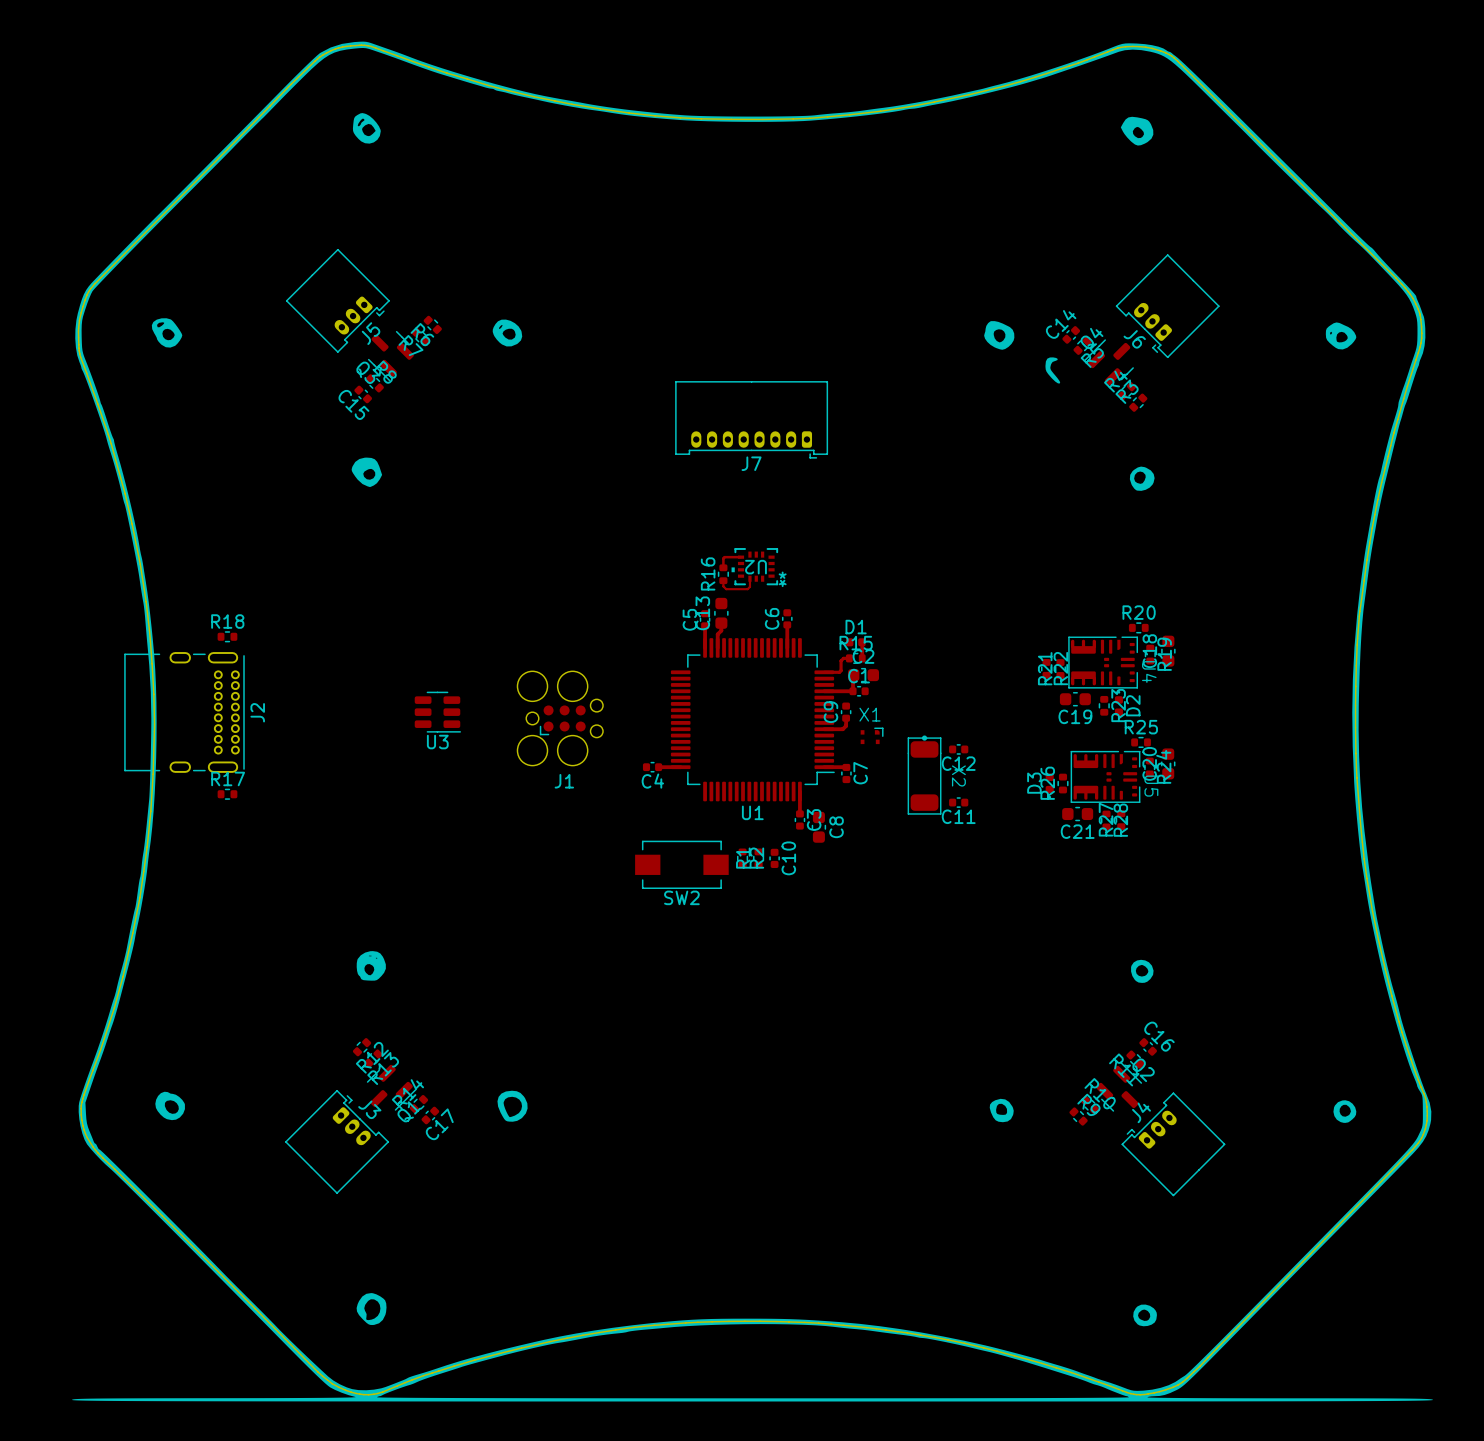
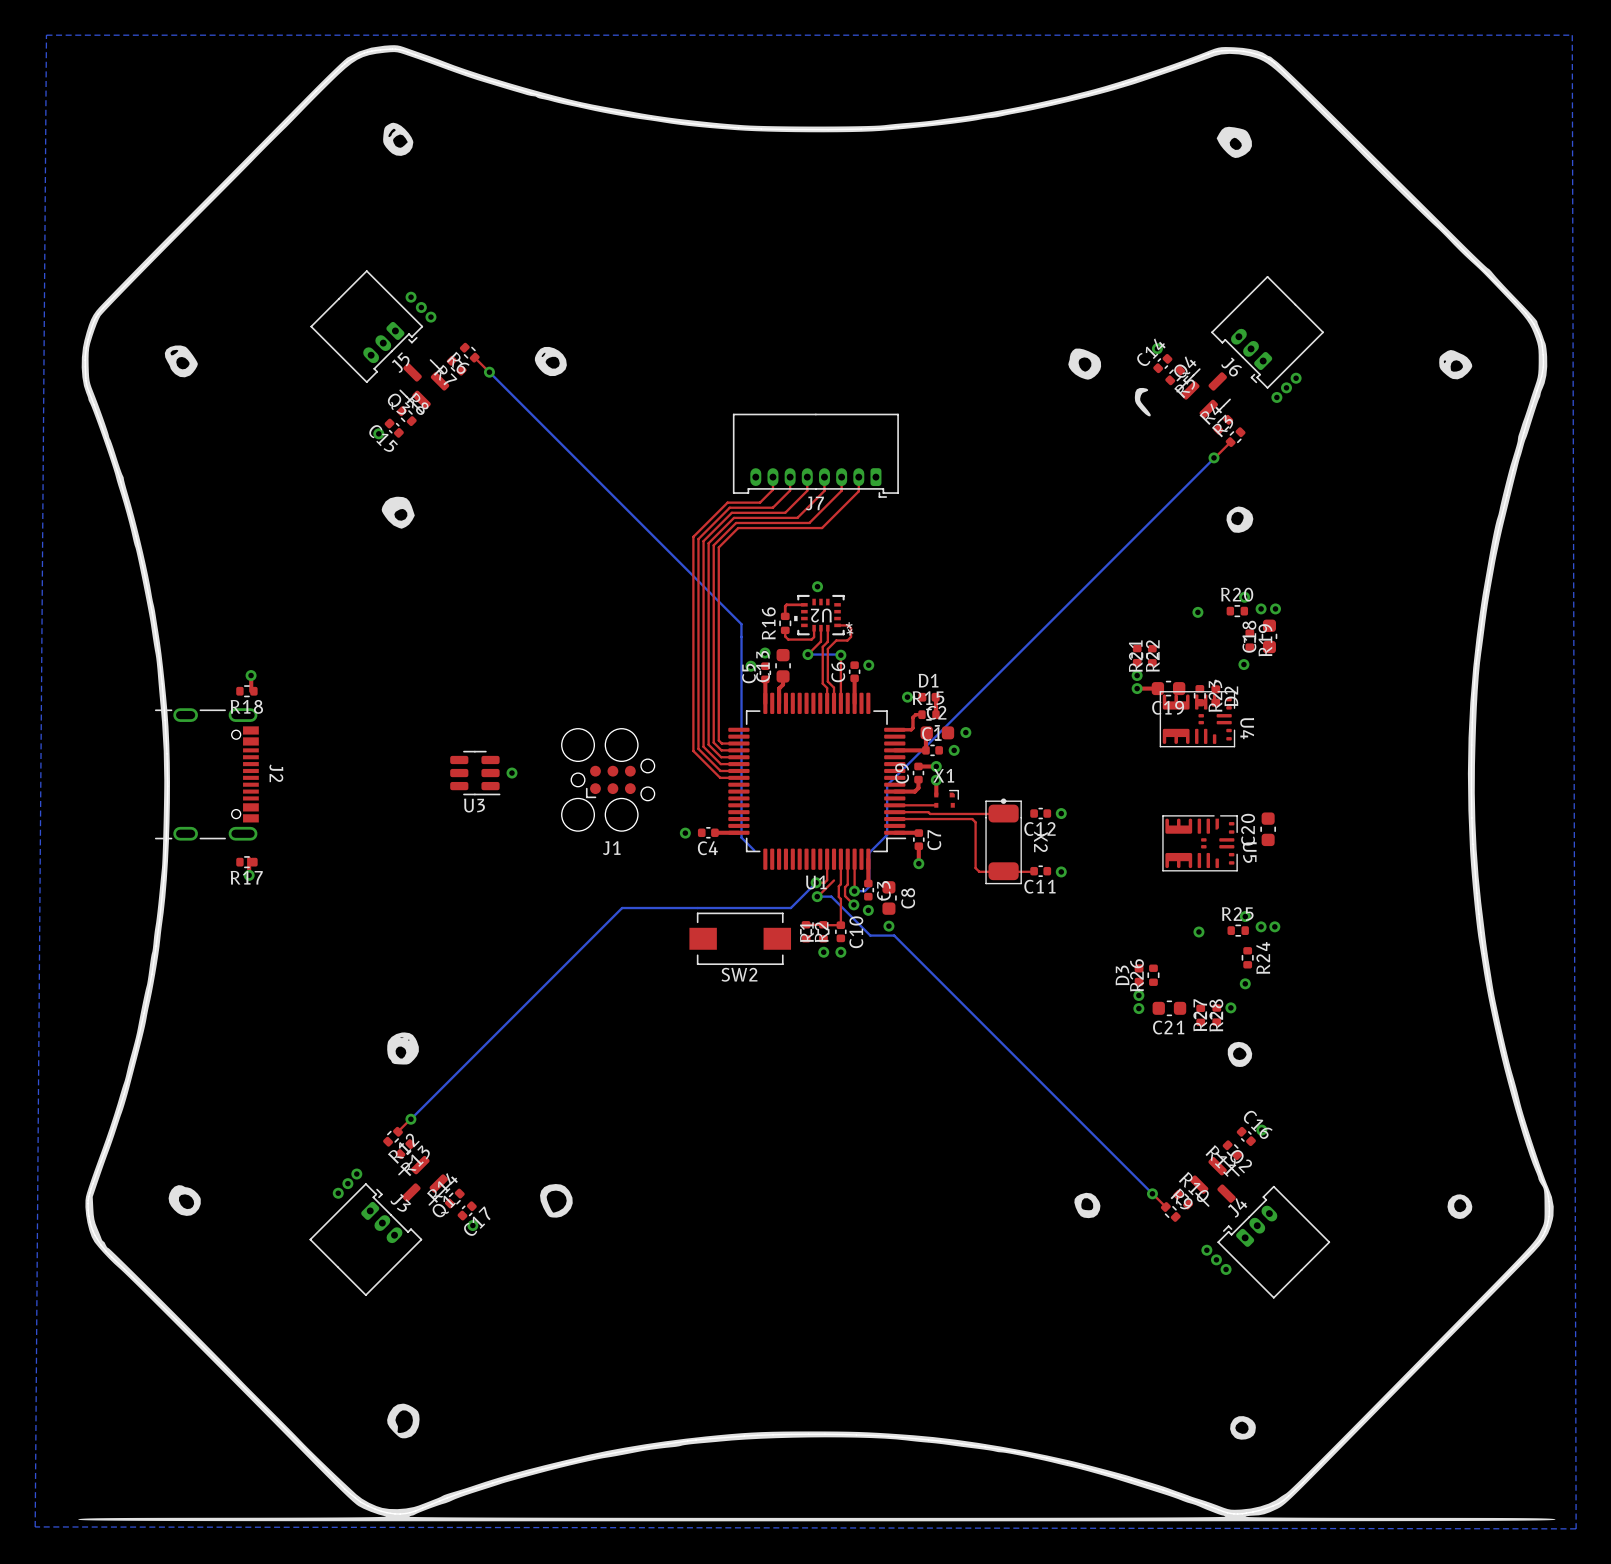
bottom zone outline: none -> (46, 35) (35, 1526) (1576, 1528) (1572, 35) (46, 35)
via: none -> (411, 297)
via: none -> (421, 307)
via: none -> (430, 317)
via: none -> (1157, 348)
top track: none -> (474, 357) (489, 372)
bottom track: none -> (489, 372) (741, 624) (741, 837) (754, 850)
via: none -> (489, 372)
via: none -> (1296, 378)
via: none -> (1286, 387)
via: none -> (1276, 397)
via: none -> (378, 433)
top track: none -> (1230, 442) (1213, 457)
bottom track: none -> (1213, 457) (887, 785) (887, 835) (885, 836)
via: none -> (1213, 457)
top track: none -> (772, 477) (772, 489) (760, 502) (727, 502) (693, 536) (693, 751) (720, 777) (738, 777)
top track: none -> (790, 477) (790, 490) (772, 507) (729, 507) (698, 539) (698, 748) (720, 770) (738, 770)
top track: none -> (824, 477) (824, 490) (797, 517) (733, 517) (708, 543) (708, 744) (721, 757) (738, 757)
top track: none -> (841, 477) (841, 490) (809, 522) (736, 522) (713, 545) (713, 742) (721, 750) (738, 750)
top track: none -> (858, 477) (858, 491) (822, 528) (738, 528) (718, 547) (718, 740) (721, 743) (738, 743)
top track: none -> (807, 477) (807, 490) (785, 512) (731, 512) (703, 541) (703, 746) (720, 764) (738, 764)
via: none -> (817, 586)
via: none -> (1244, 597)
via: none -> (1261, 608)
via: none -> (1275, 608)
via: none -> (1197, 612)
top track: none -> (837, 625) (848, 625) (851, 628) (851, 636) (847, 640) (836, 640) (827, 648) (827, 681) (834, 687) (834, 703)
top track: none -> (820, 628) (820, 641) (807, 654)
top track: none -> (827, 628) (827, 641) (822, 646) (822, 683) (827, 688) (827, 703)
via: none -> (765, 653)
bottom track: none -> (807, 654) (840, 655)
via: none -> (807, 654)
top track: none -> (840, 655) (840, 703)
via: none -> (840, 655)
via: none -> (868, 665)
via: none -> (1243, 664)
via: none -> (750, 666)
R18 name position: R18 (227, 621) -> R18 (246, 706)
top track: none -> (251, 675) (251, 691)
via: none -> (251, 675)
via: none -> (1137, 675)
R20 position: (1138, 627) -> (1237, 611)
top track: none -> (1137, 688) (1157, 688)
via: none -> (1137, 688)
via: none -> (907, 697)
C18 position: (1168, 651) -> (1269, 636)
J2 footprint: [124, 652, 245, 773] -> [154, 708, 259, 841]
R19 position: (1150, 654) -> (1249, 640)
R22 position: (1046, 668) -> (1137, 655)
R21 position: (1060, 669) -> (1152, 655)
via: none -> (965, 732)
via: none -> (954, 750)
C19 position: (1075, 699) -> (1168, 688)
D2 position: (1118, 703) -> (1215, 693)
R23 position: (1104, 705) -> (1199, 695)
top track: none -> (918, 766) (936, 766)
via: none -> (936, 766)
via: none -> (511, 773)
top track: none -> (936, 780) (936, 795)
via: none -> (936, 780)
top track: none -> (894, 805) (936, 805)
R25 position: (1141, 742) -> (1238, 930)
top track: none -> (894, 812) (1003, 813)
via: none -> (1061, 813)
top track: none -> (894, 819) (972, 819) (975, 822) (975, 868) (979, 871) (1033, 871)
via: none -> (685, 833)
R24 position: (1149, 767) -> (1247, 957)
bottom track: none -> (885, 836) (869, 852) (869, 886) (864, 891) (854, 891)
R17 name position: R17 (228, 778) -> R17 (246, 877)
top track: none -> (918, 846) (918, 863)
R26 position: (1062, 783) -> (1153, 975)
D3 position: (1049, 786) -> (1139, 977)
top track: none -> (249, 858) (249, 875)
top track: none -> (827, 859) (827, 880) (824, 882) (816, 882)
top track: none -> (840, 859) (840, 884) (838, 886) (840, 925) (806, 924)
top track: none -> (847, 859) (847, 884) (845, 887) (845, 896) (853, 904)
top track: none -> (854, 859) (854, 891)
via: none -> (918, 863)
via: none -> (1061, 871)
via: none -> (249, 875)
top track: none -> (834, 880) (817, 896)
bottom track: none -> (816, 882) (790, 908) (622, 908) (410, 1119)
via: none -> (816, 882)
C21 position: (1077, 814) -> (1169, 1008)
via: none -> (854, 891)
R28 position: (1106, 820) -> (1200, 1015)
R27 position: (1121, 820) -> (1216, 1015)
bottom track: none -> (817, 896) (831, 896) (870, 935) (894, 935) (1152, 1193)
via: none -> (817, 896)
via: none -> (853, 904)
via: none -> (868, 910)
via: none -> (1245, 916)
via: none -> (888, 926)
via: none -> (1261, 926)
via: none -> (1274, 926)
via: none -> (1198, 931)
via: none -> (823, 952)
via: none -> (840, 952)
via: none -> (1245, 983)
via: none -> (1138, 995)
via: none -> (1230, 1007)
via: none -> (1138, 1008)
top track: none -> (410, 1119) (397, 1131)
via: none -> (410, 1119)
via: none -> (1261, 1130)
via: none -> (356, 1174)
via: none -> (347, 1183)
via: none -> (338, 1193)
top track: none -> (1152, 1193) (1165, 1207)
via: none -> (1152, 1193)
via: none -> (472, 1225)
via: none -> (1206, 1250)
via: none -> (1216, 1259)
via: none -> (1226, 1269)

